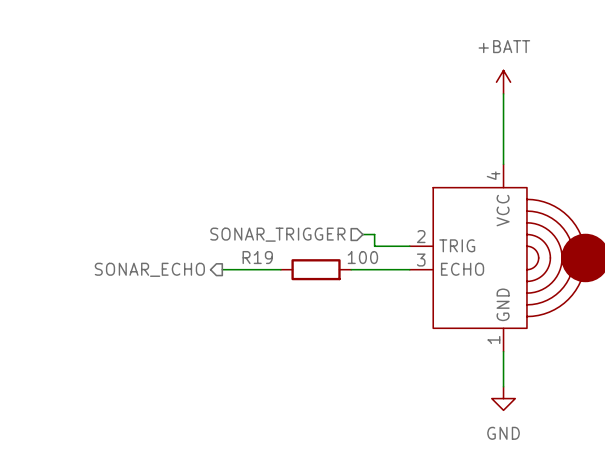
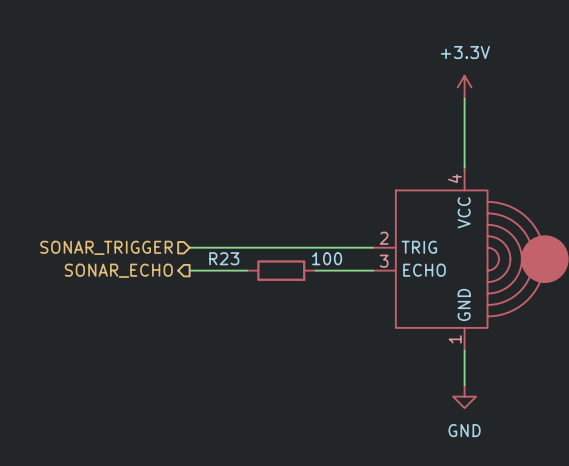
power symbol: +BATT (503, 82) -> +3.3V (464, 87)
hierarchical label position: SONAR_TRIGGER (277, 234) -> SONAR_TRIGGER (106, 247)
wire: (362, 234) (374, 234) (374, 246) -> (189, 247) (338, 247)
R19 name: R19 (257, 257) -> R23 (224, 258)

